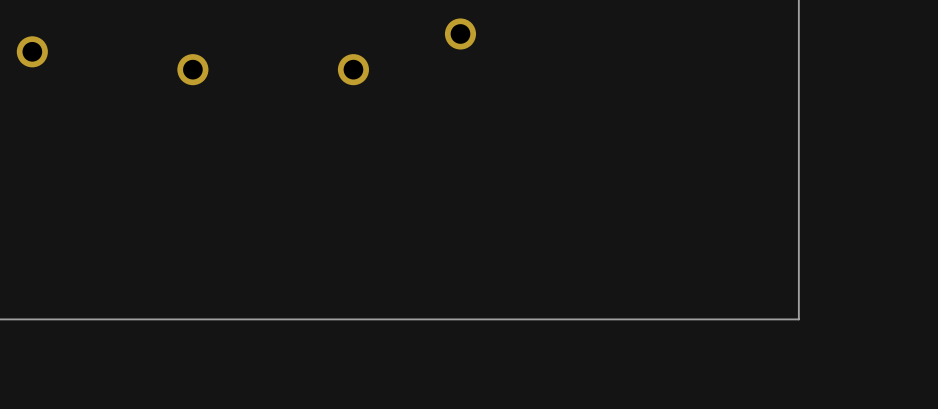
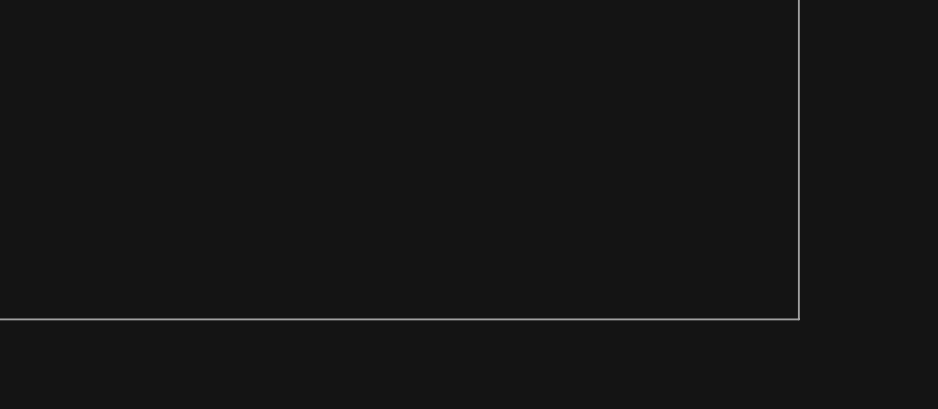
via: (460, 33) -> none
via: (32, 51) -> none
via: (192, 69) -> none
via: (353, 69) -> none

